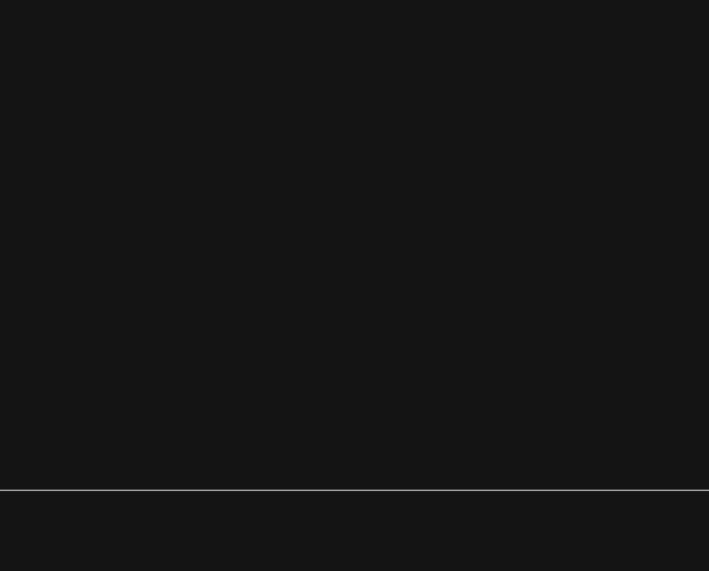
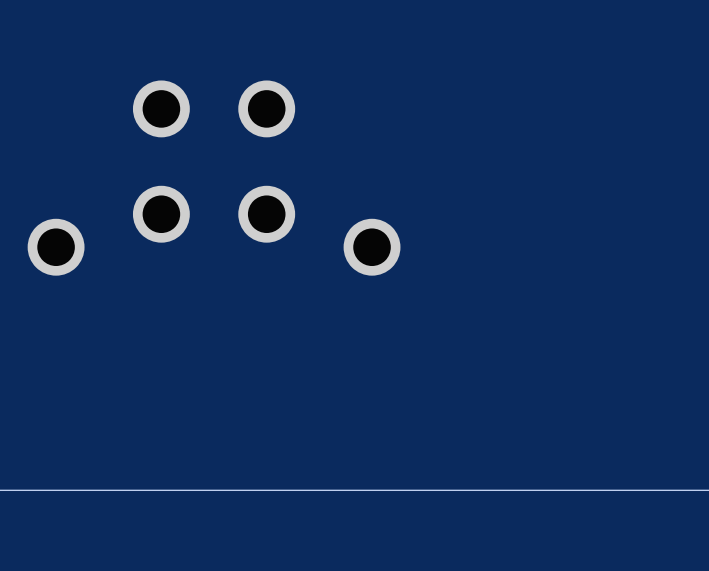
part: none -> (214, 178)

